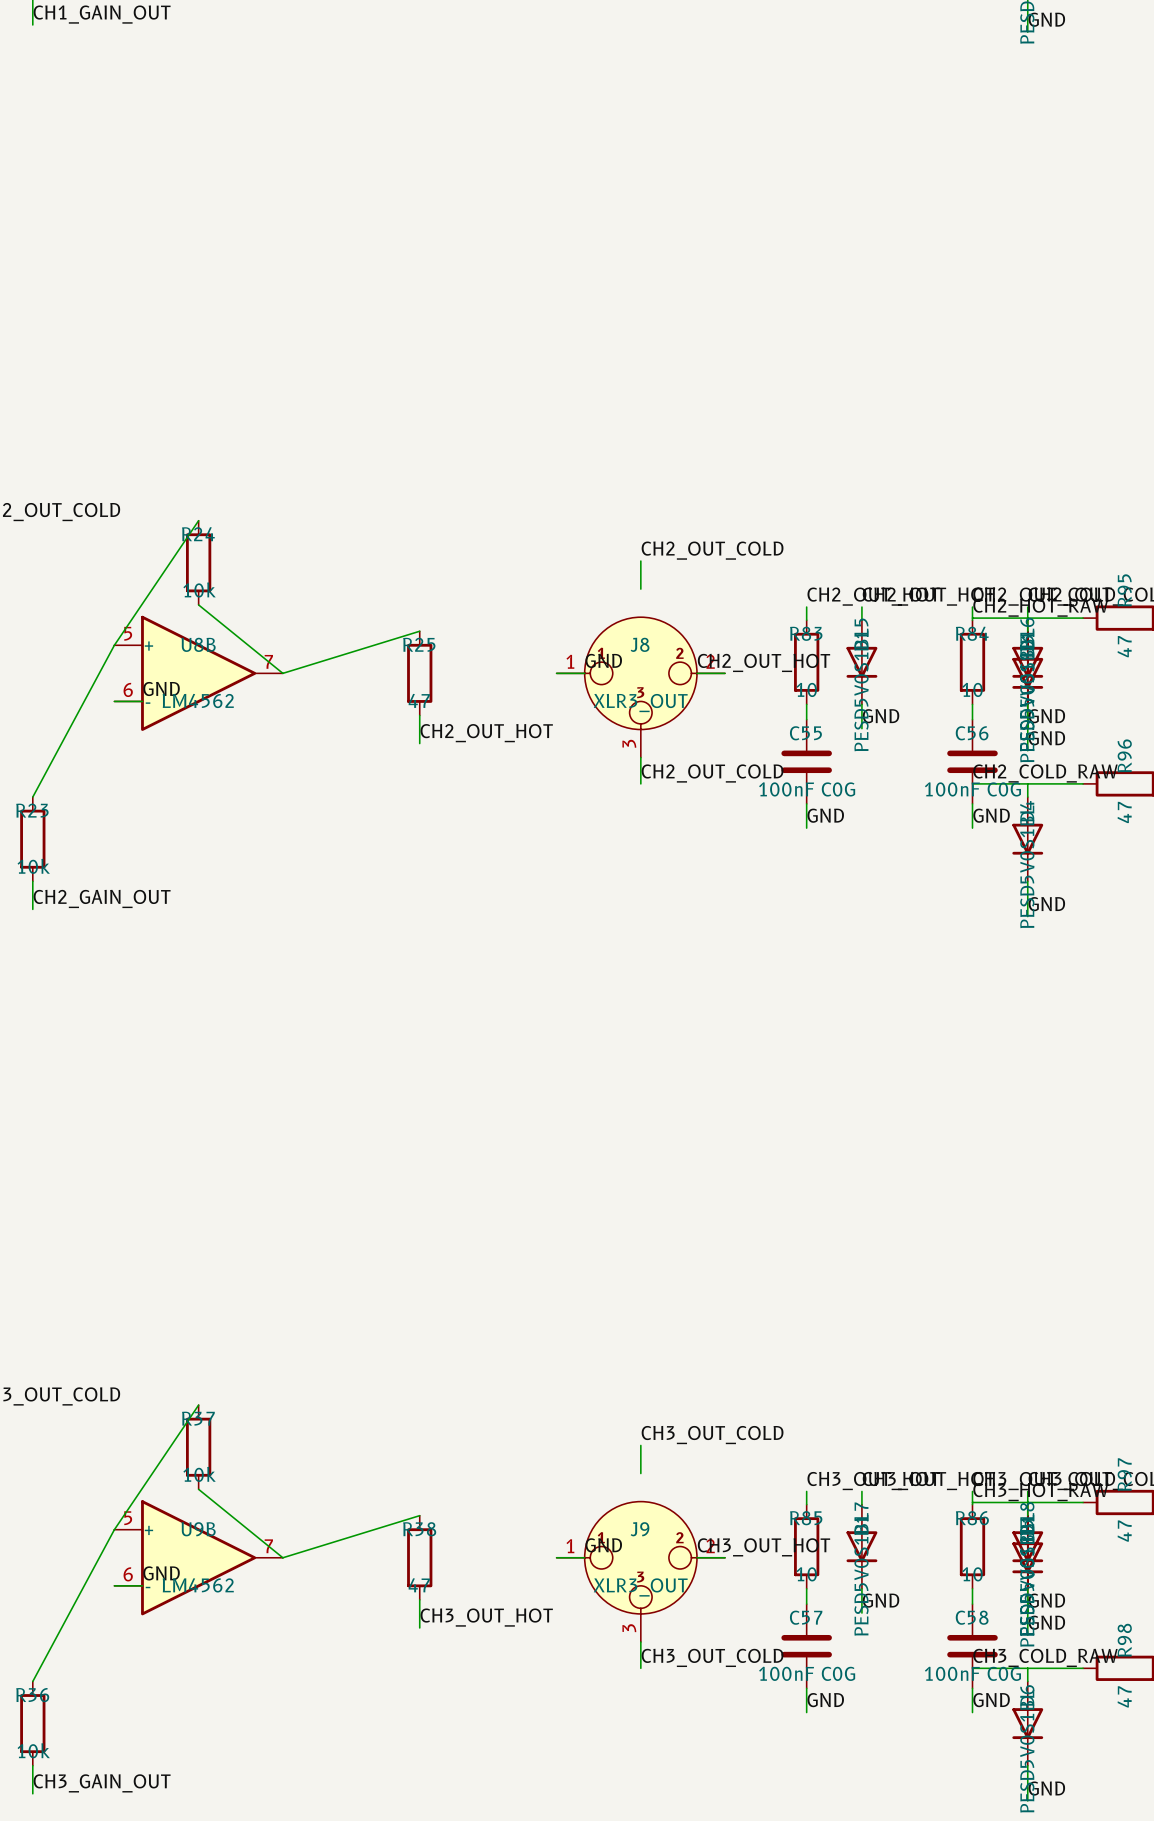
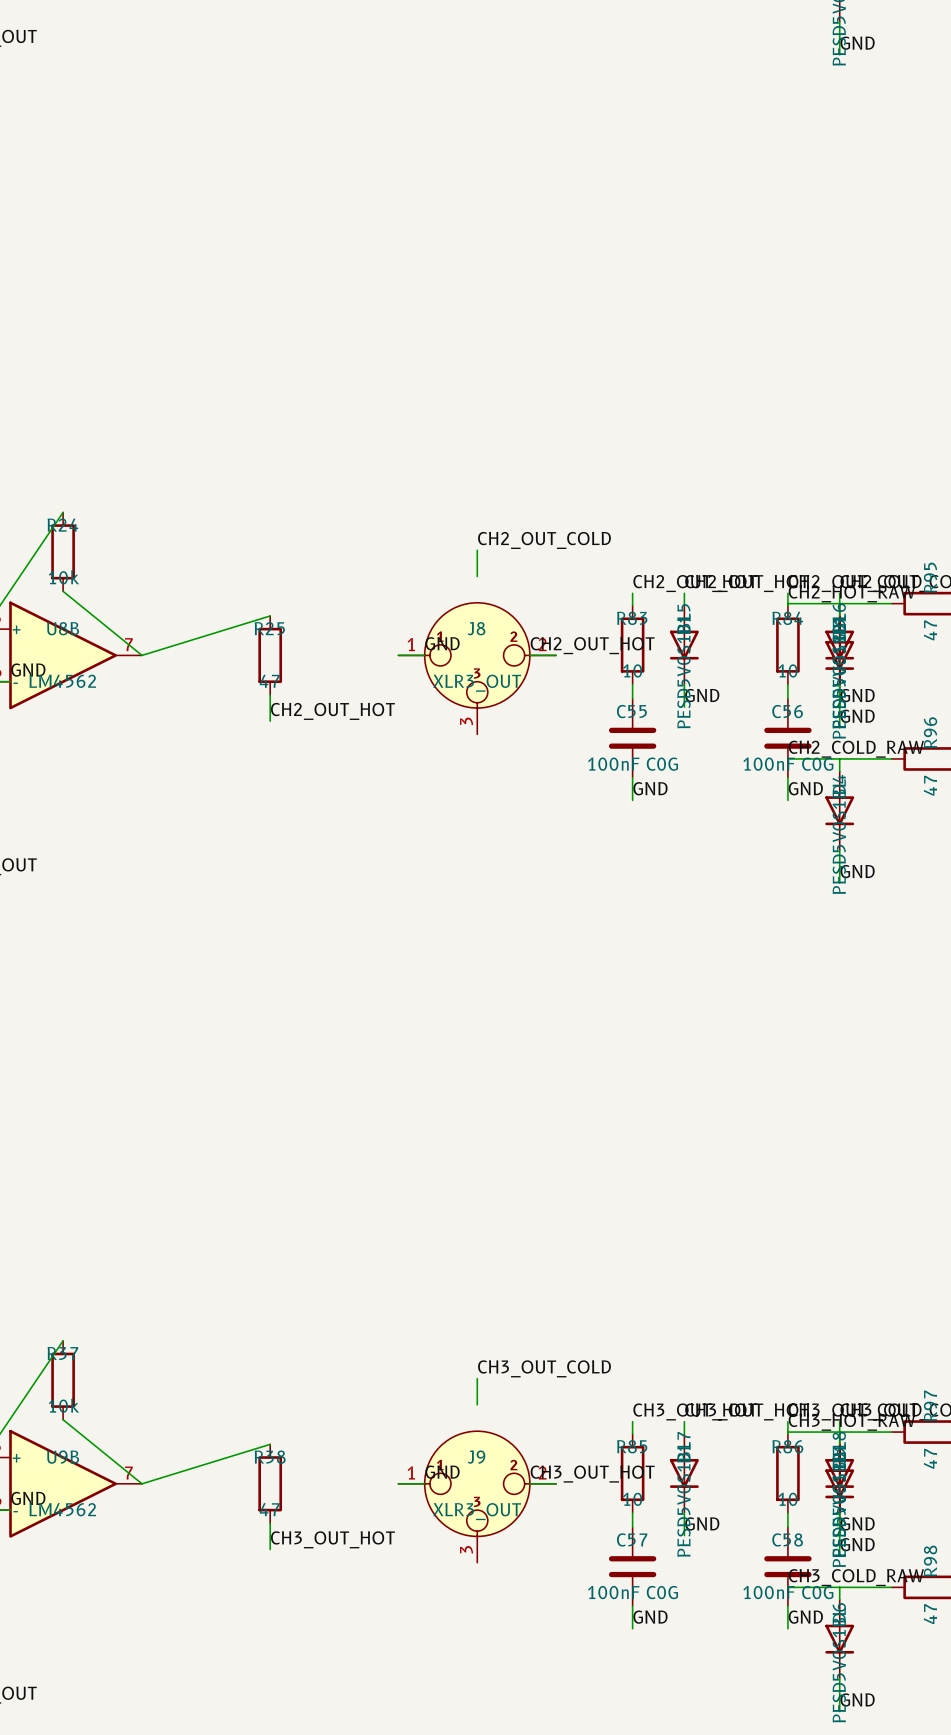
wire: (640, 757) (640, 783) -> none
label: CH2_OUT_COLD (712, 773) -> none
wire: (640, 1642) (640, 1668) -> none
label: CH3_OUT_COLD (712, 1657) -> none

